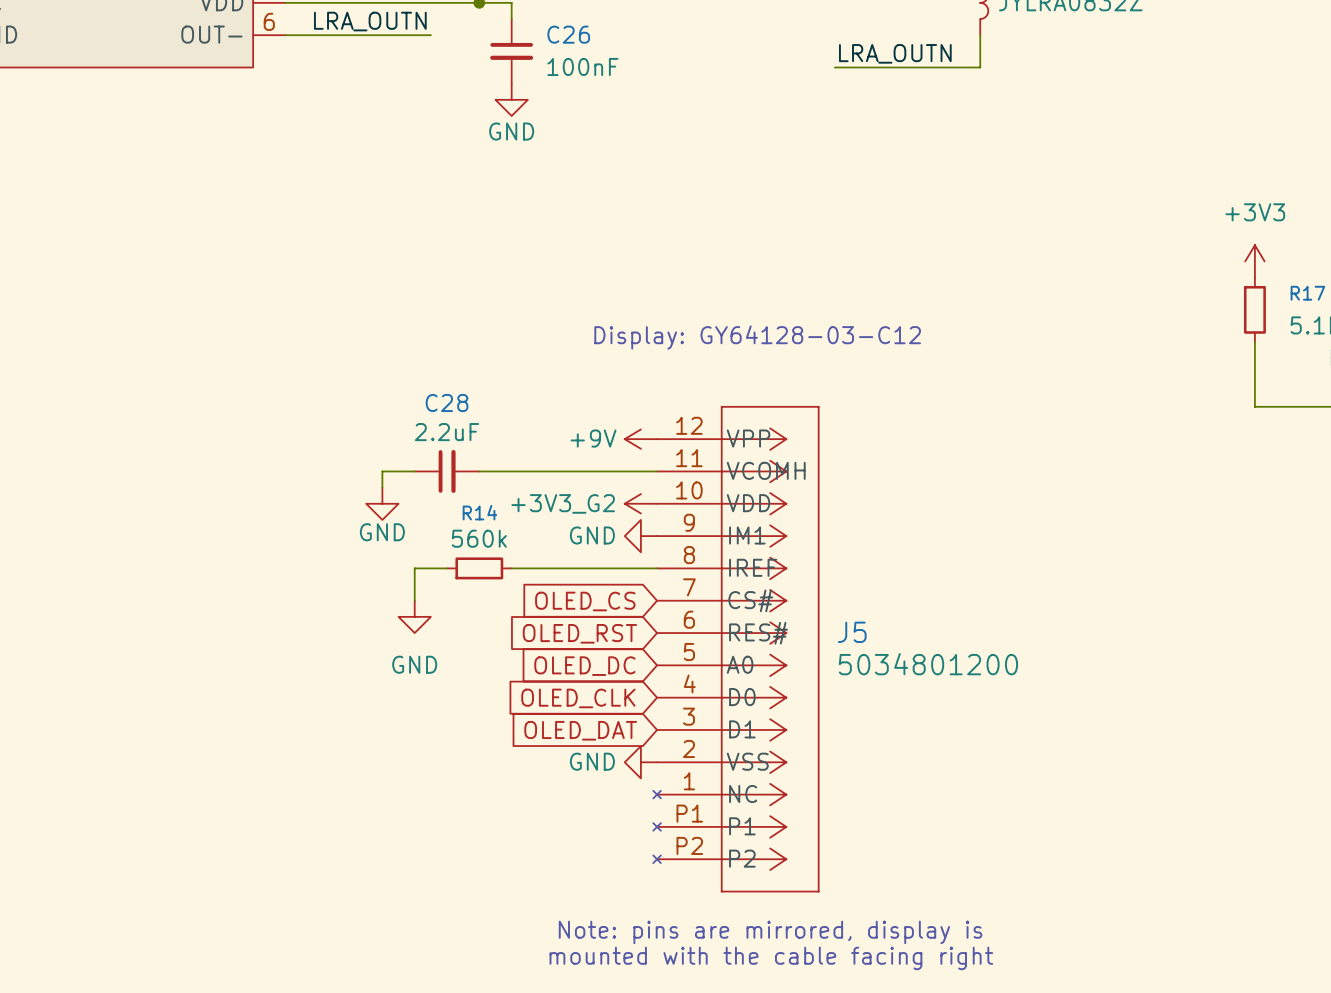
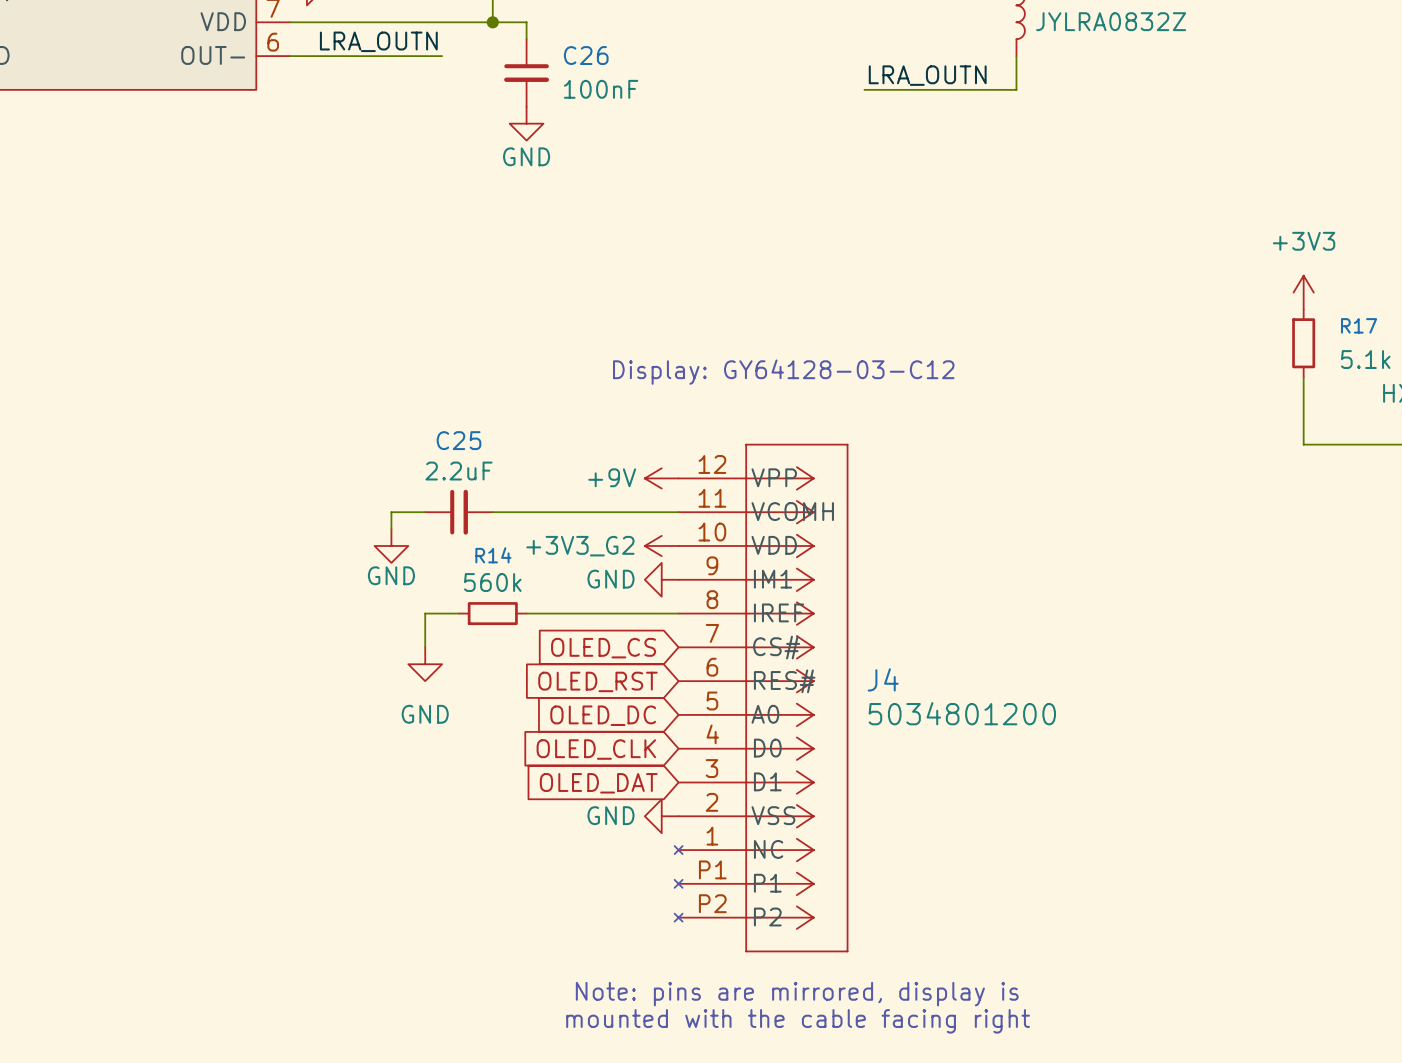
C28 name: C28 (447, 402) -> C25 (459, 440)
J5 name: J5 (852, 632) -> J4 (883, 679)

